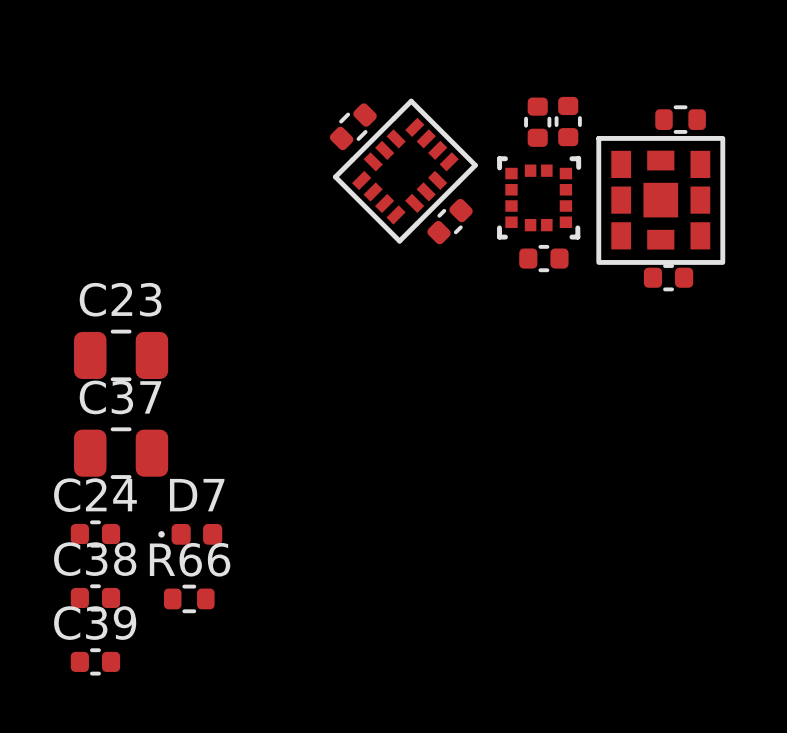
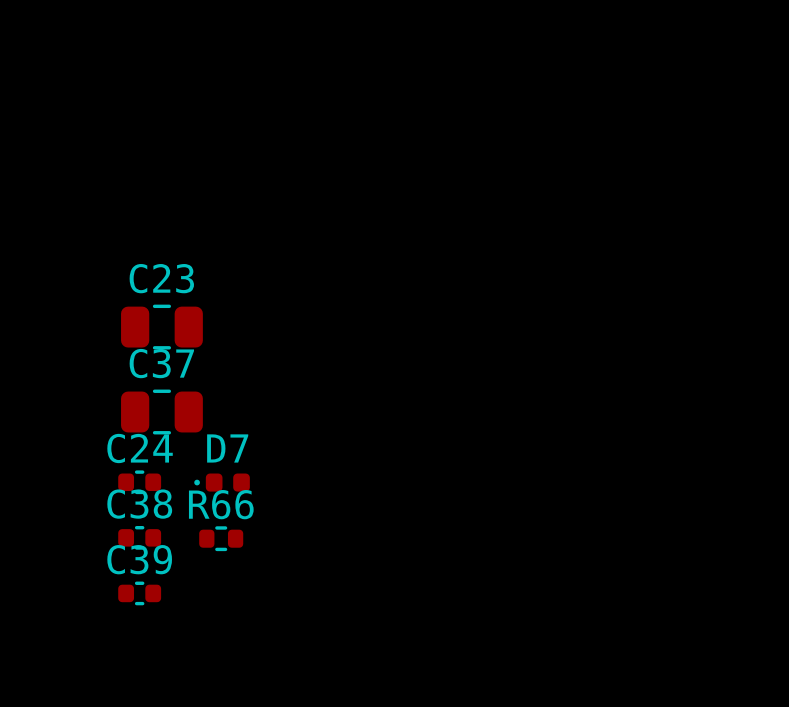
part: (680, 119) -> none
part: (568, 121) -> none
part: (537, 122) -> none
part: (353, 126) -> none
part: (405, 171) -> none
part: (539, 197) -> none
part: (660, 200) -> none
part: (450, 221) -> none
part: (543, 258) -> none
part: (668, 277) -> none

